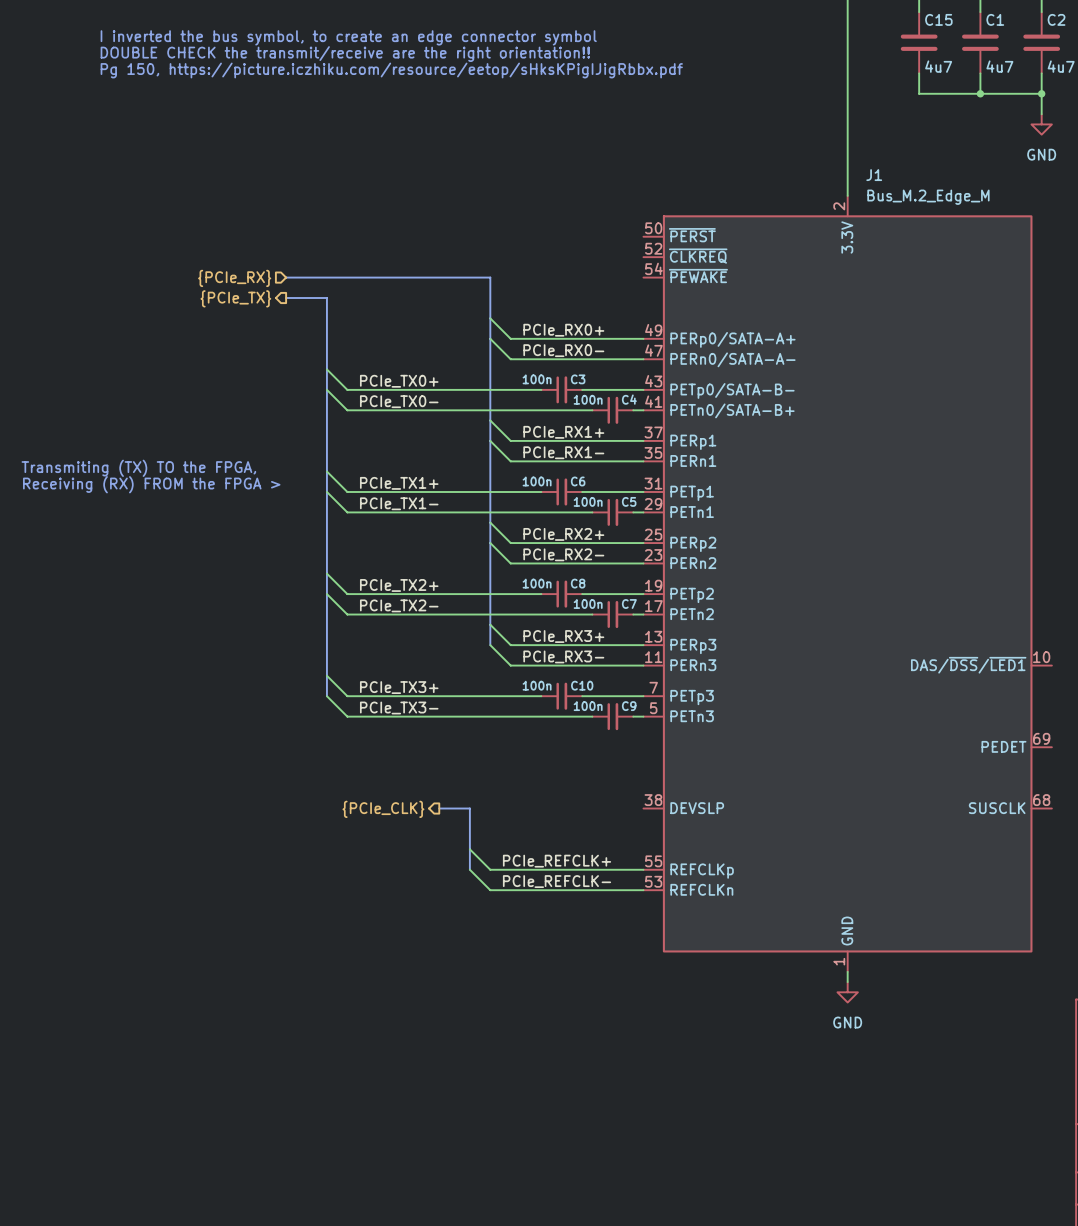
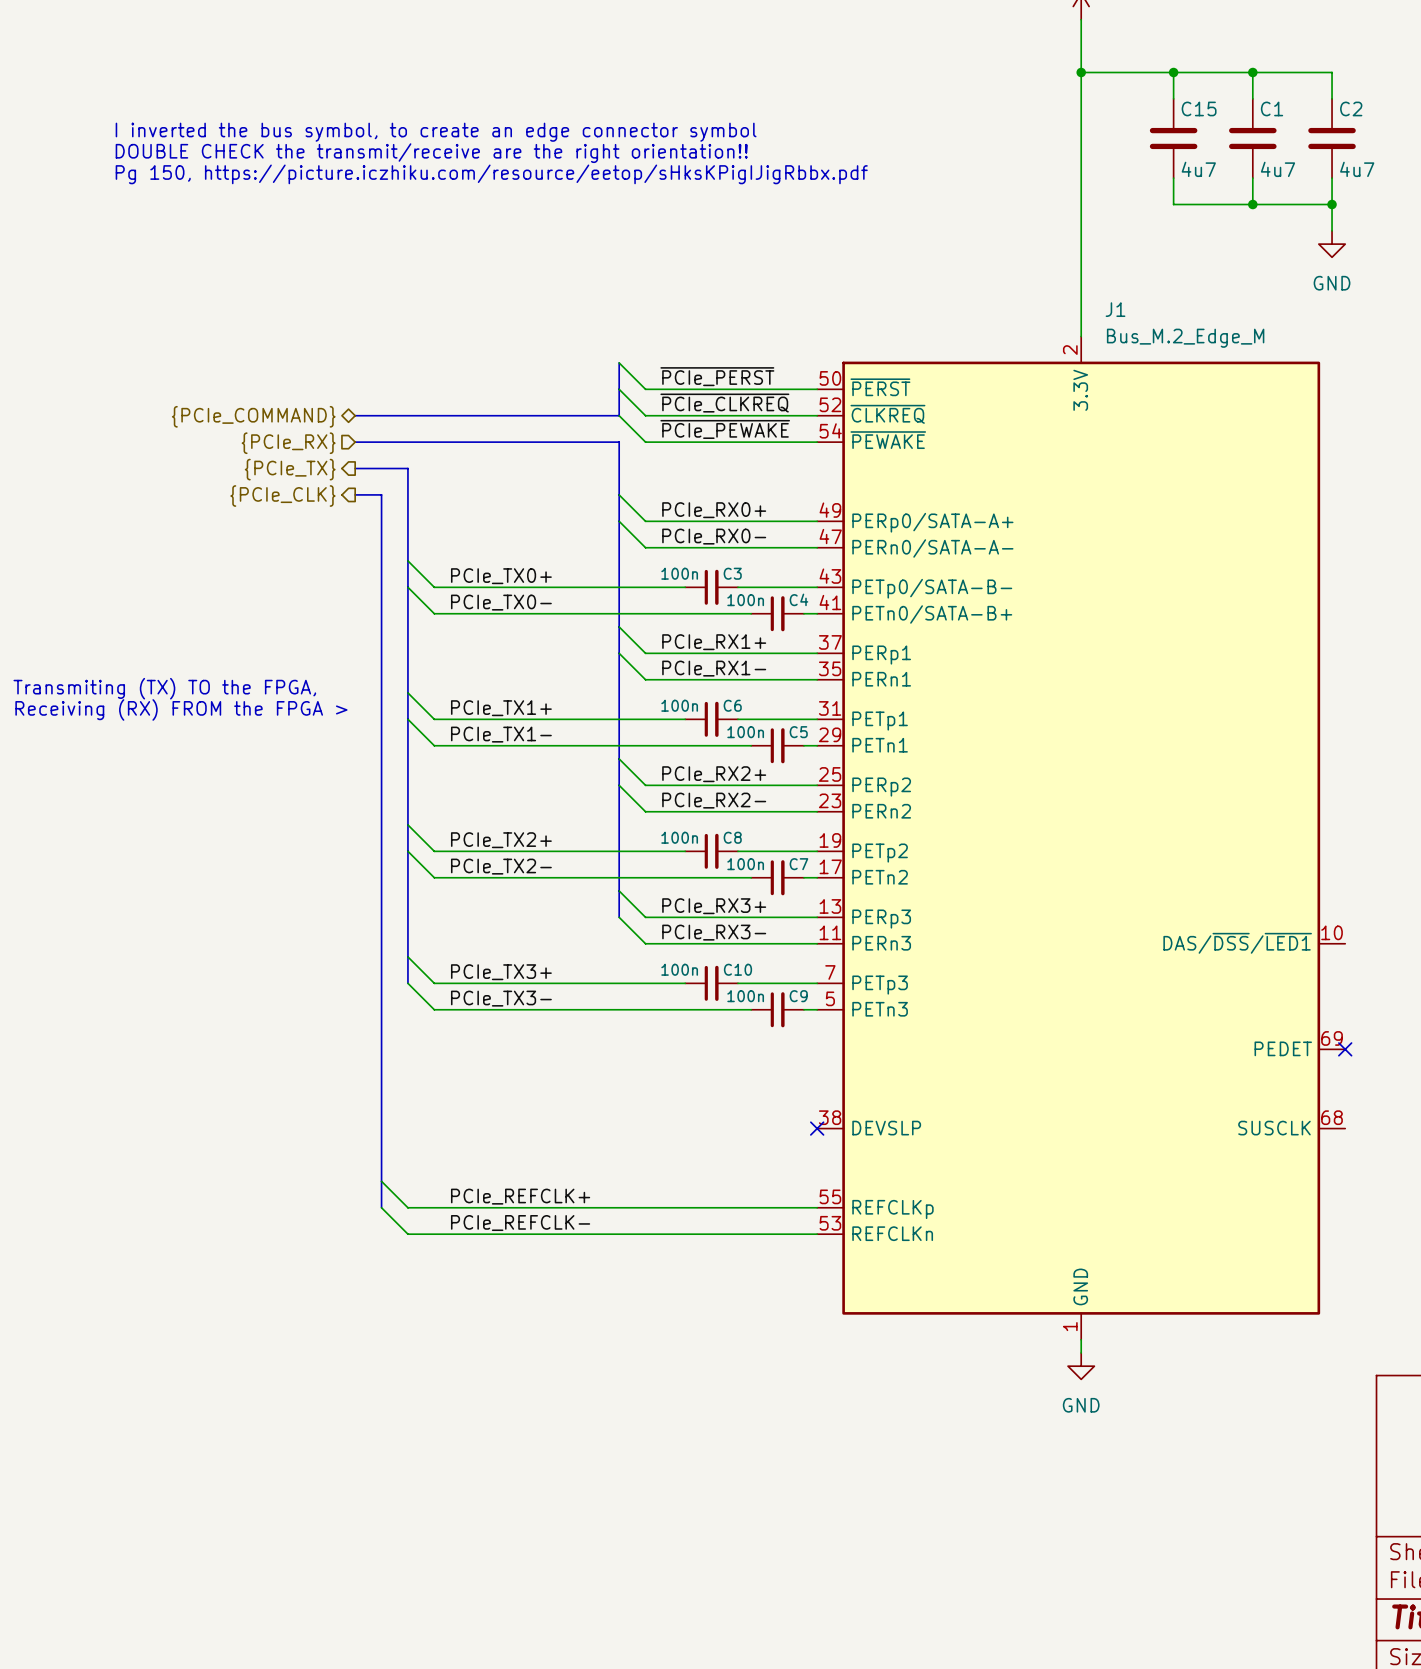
wire: none -> (619, 362) (645, 389) (817, 389)
bus: none -> (619, 362) (619, 415) (355, 415)
label: none -> ~{PCIe_PERST} (717, 376)
wire: none -> (619, 389) (645, 415) (817, 415)
label: none -> ~{PCIe_CLKREQ} (724, 403)
hierarchical label: none -> {PCIe_COMMAND} (253, 416)
wire: none -> (619, 415) (645, 442) (817, 442)
label: none -> ~{PCIe_PEWAKE} (725, 429)
bus: none -> (355, 494) (381, 494) (381, 1207)
hierarchical label: none -> {PCIe_CLK} (282, 496)
no-connect mark: none -> (1345, 1049)
bus: (439, 808) (469, 808) (469, 869) -> none
no-connect mark: none -> (817, 1128)
hierarchical label: {PCIe_CLK} (383, 809) -> none
wire: (469, 849) (490, 869) -> (381, 1181) (407, 1207) (619, 1207)
label position: PCIe_REFCLK+ (557, 861) -> PCIe_REFCLK+ (520, 1196)
wire: (469, 869) (490, 890) -> (381, 1207) (407, 1234) (619, 1234)
label position: PCIe_REFCLK- (557, 881) -> PCIe_REFCLK- (520, 1223)

